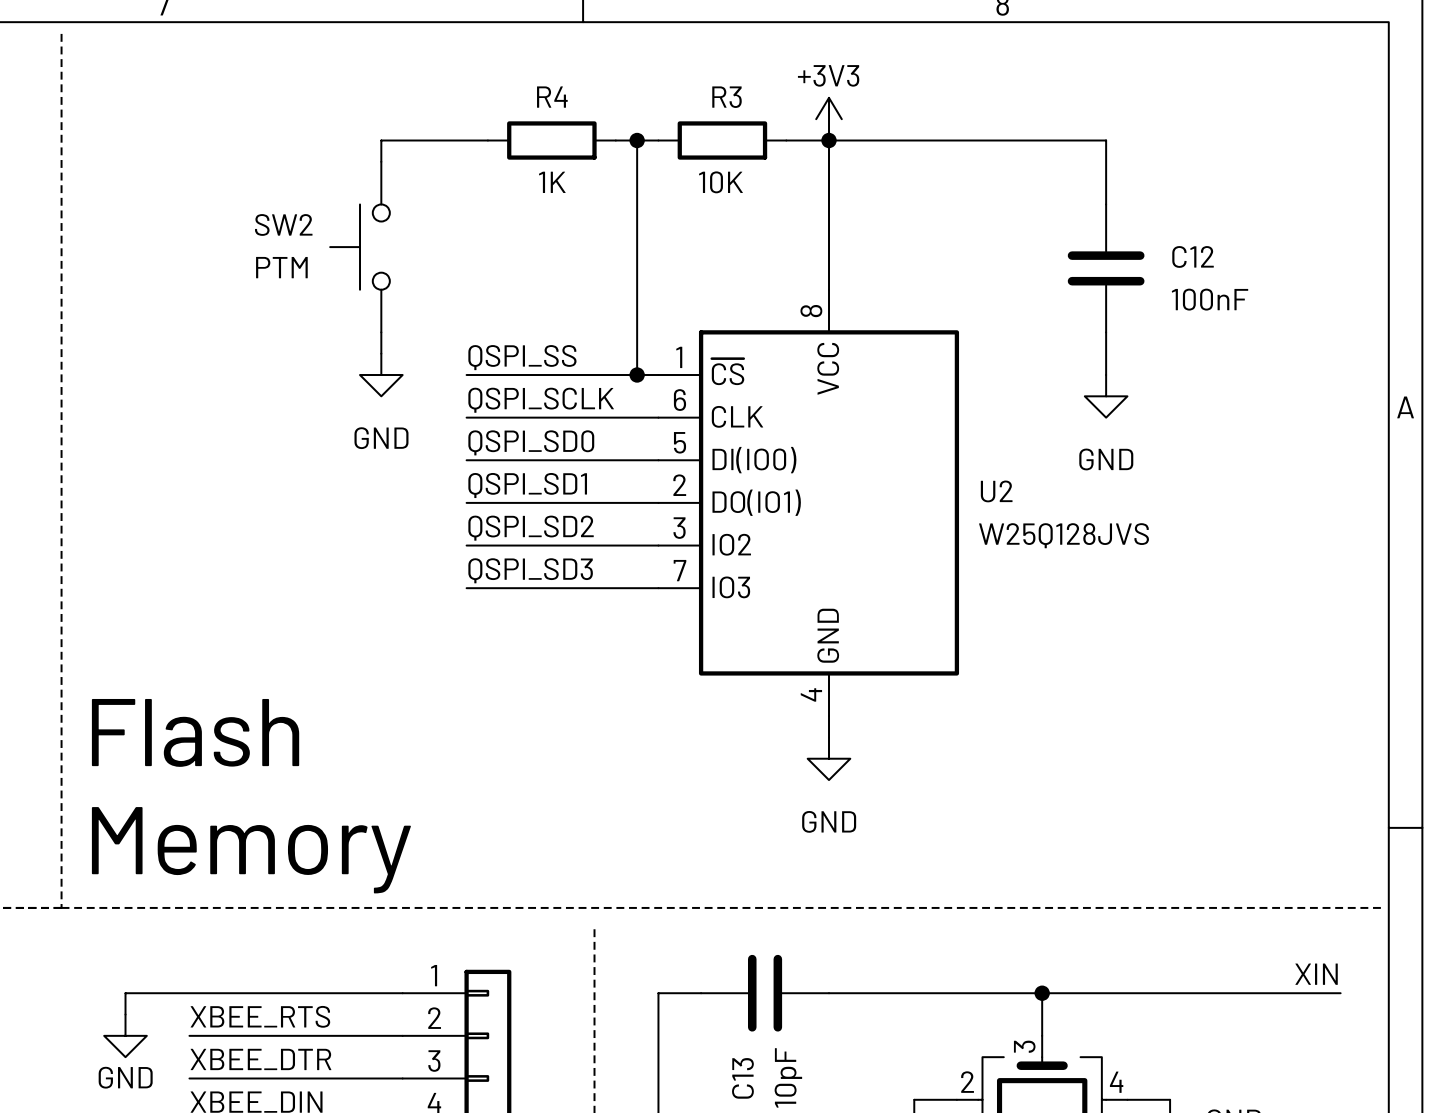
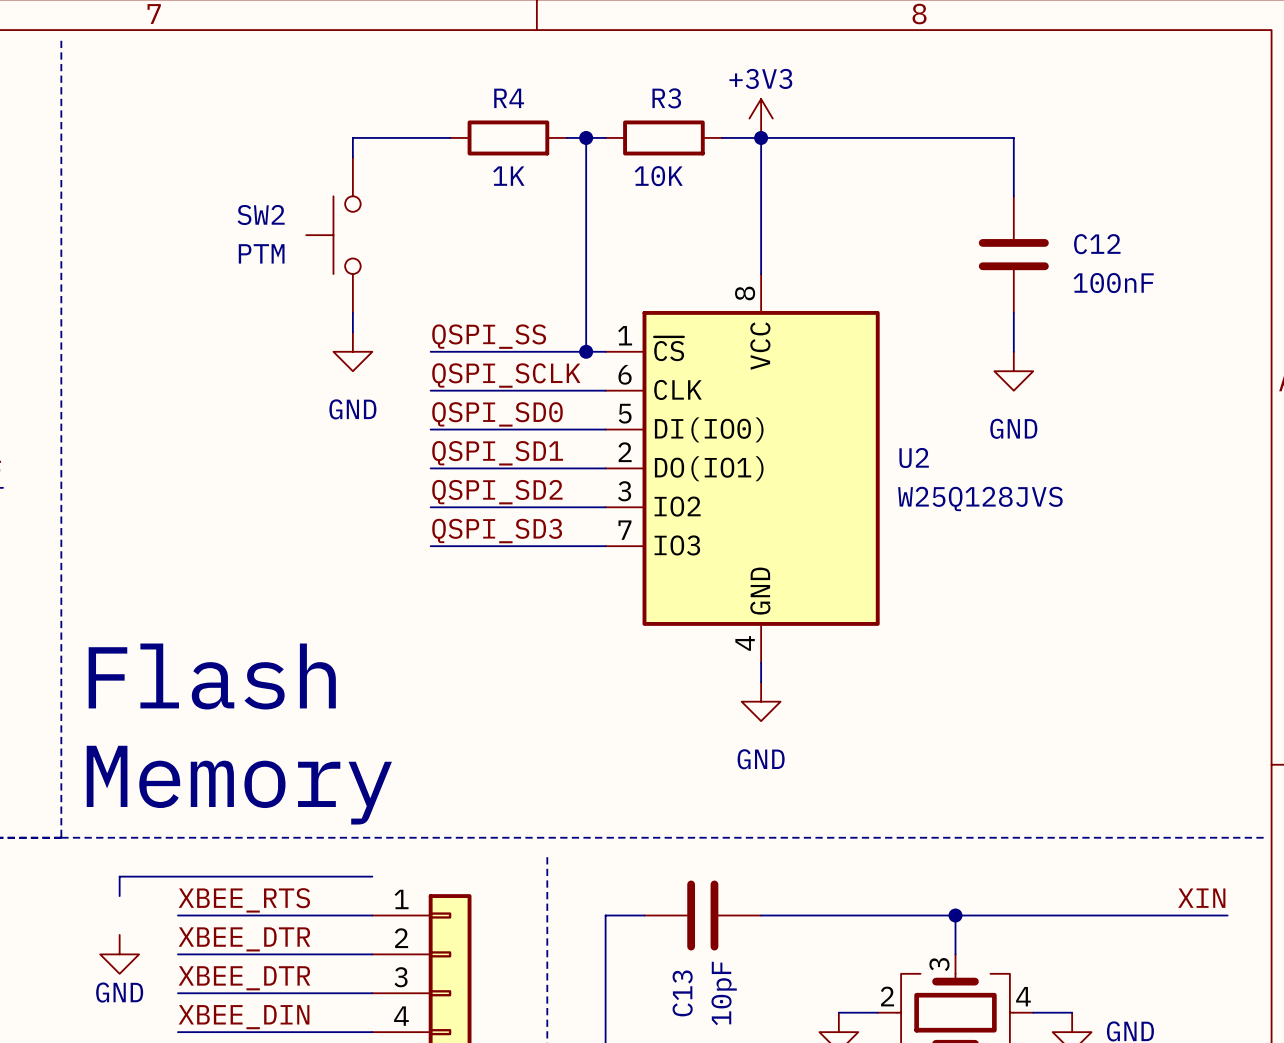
wire: none -> (372, 876) (119, 876) (119, 896)
label: none -> XBEE_RTS (244, 900)
wire: (189, 993) (125, 993) (125, 1014) -> none
label: XBEE_RTS (260, 1016) -> XBEE_DTR (244, 939)

